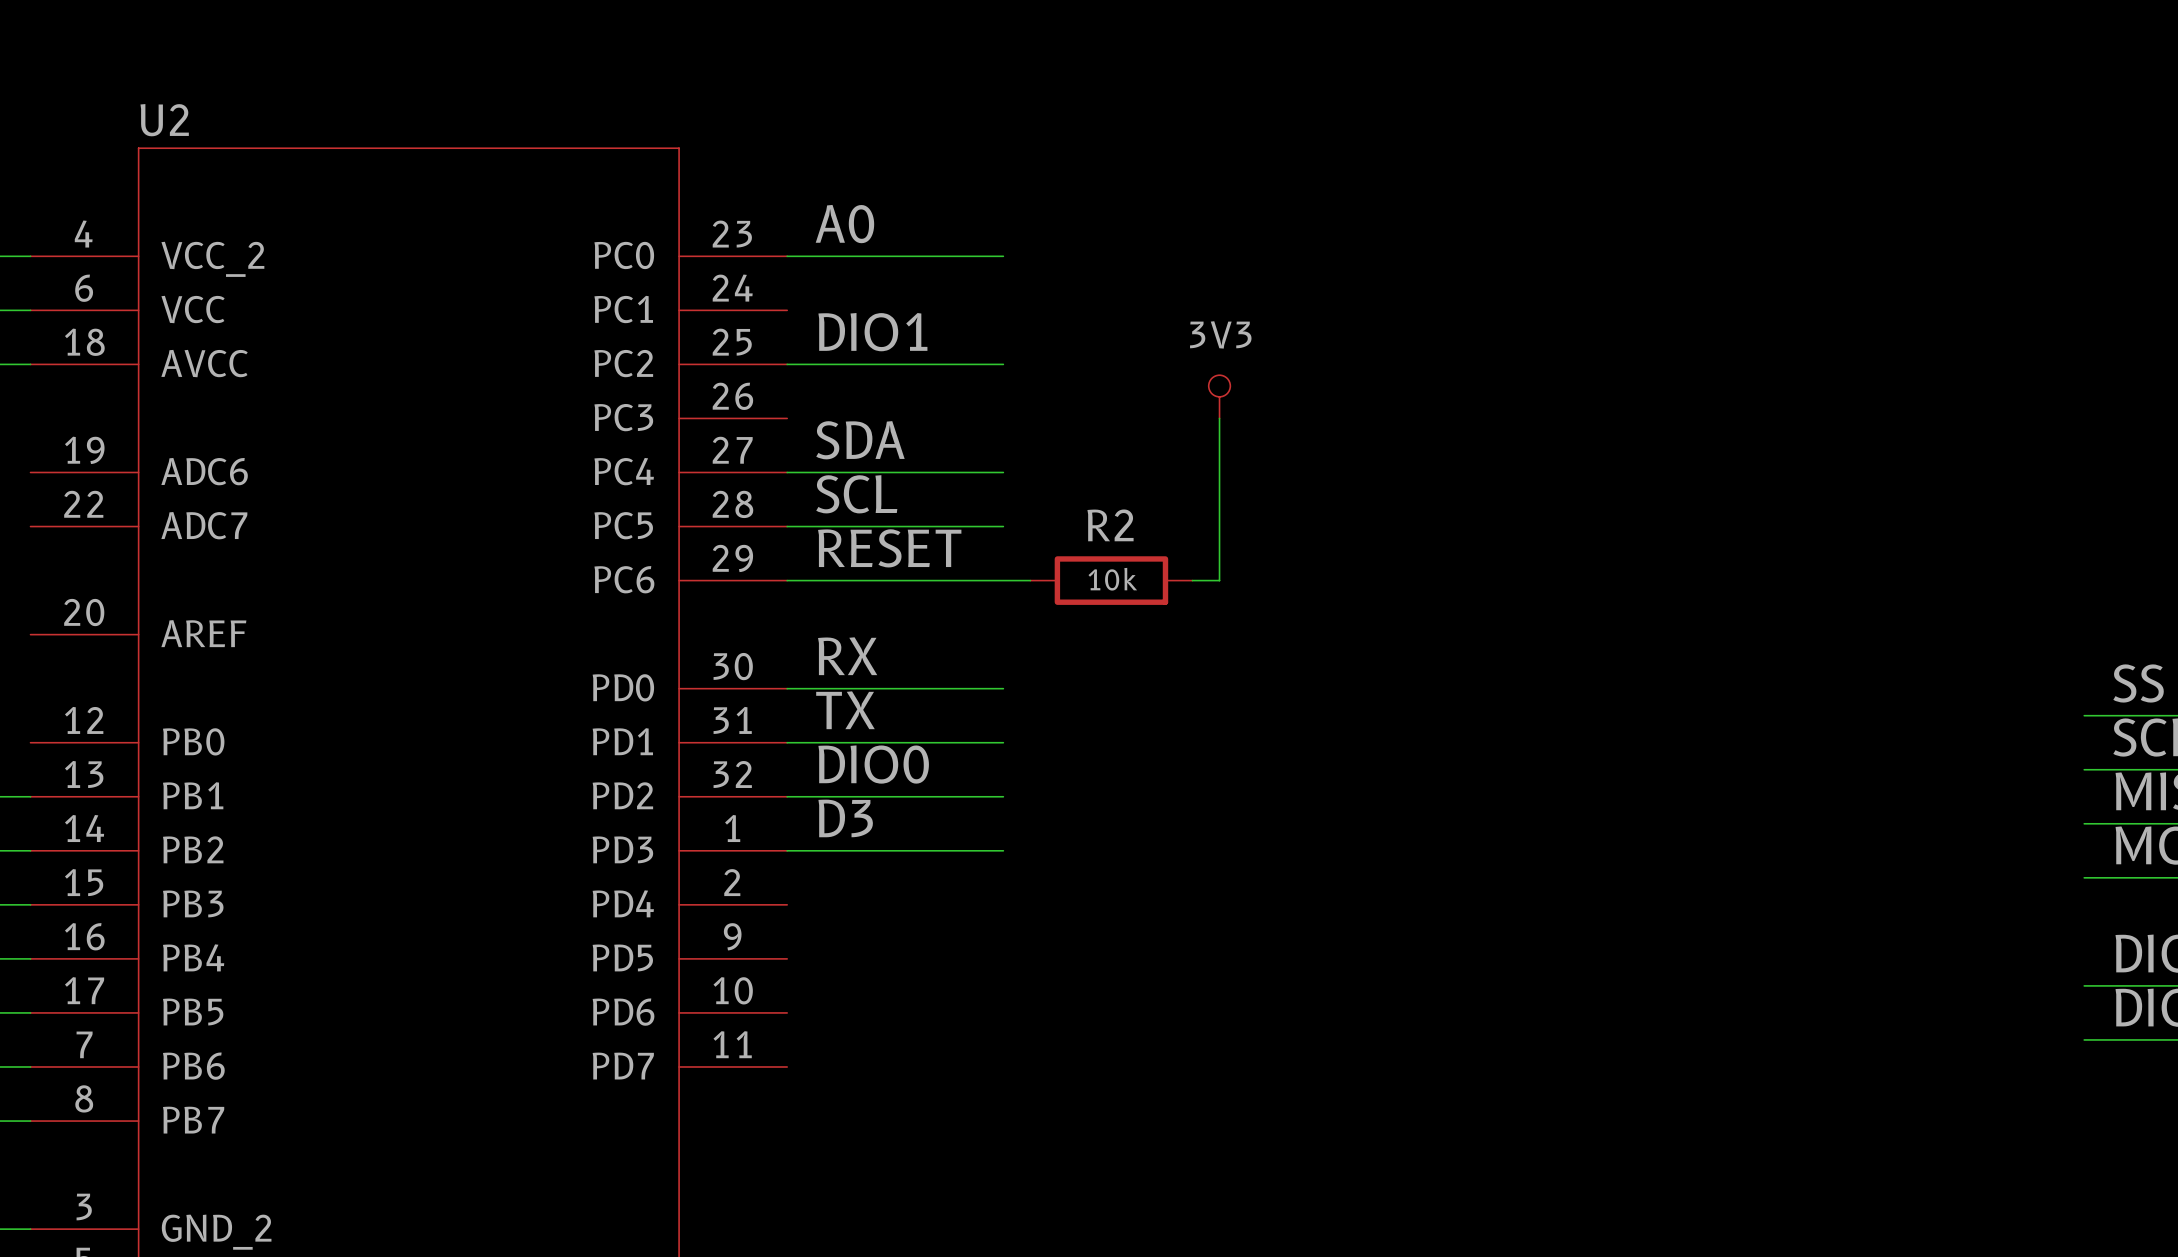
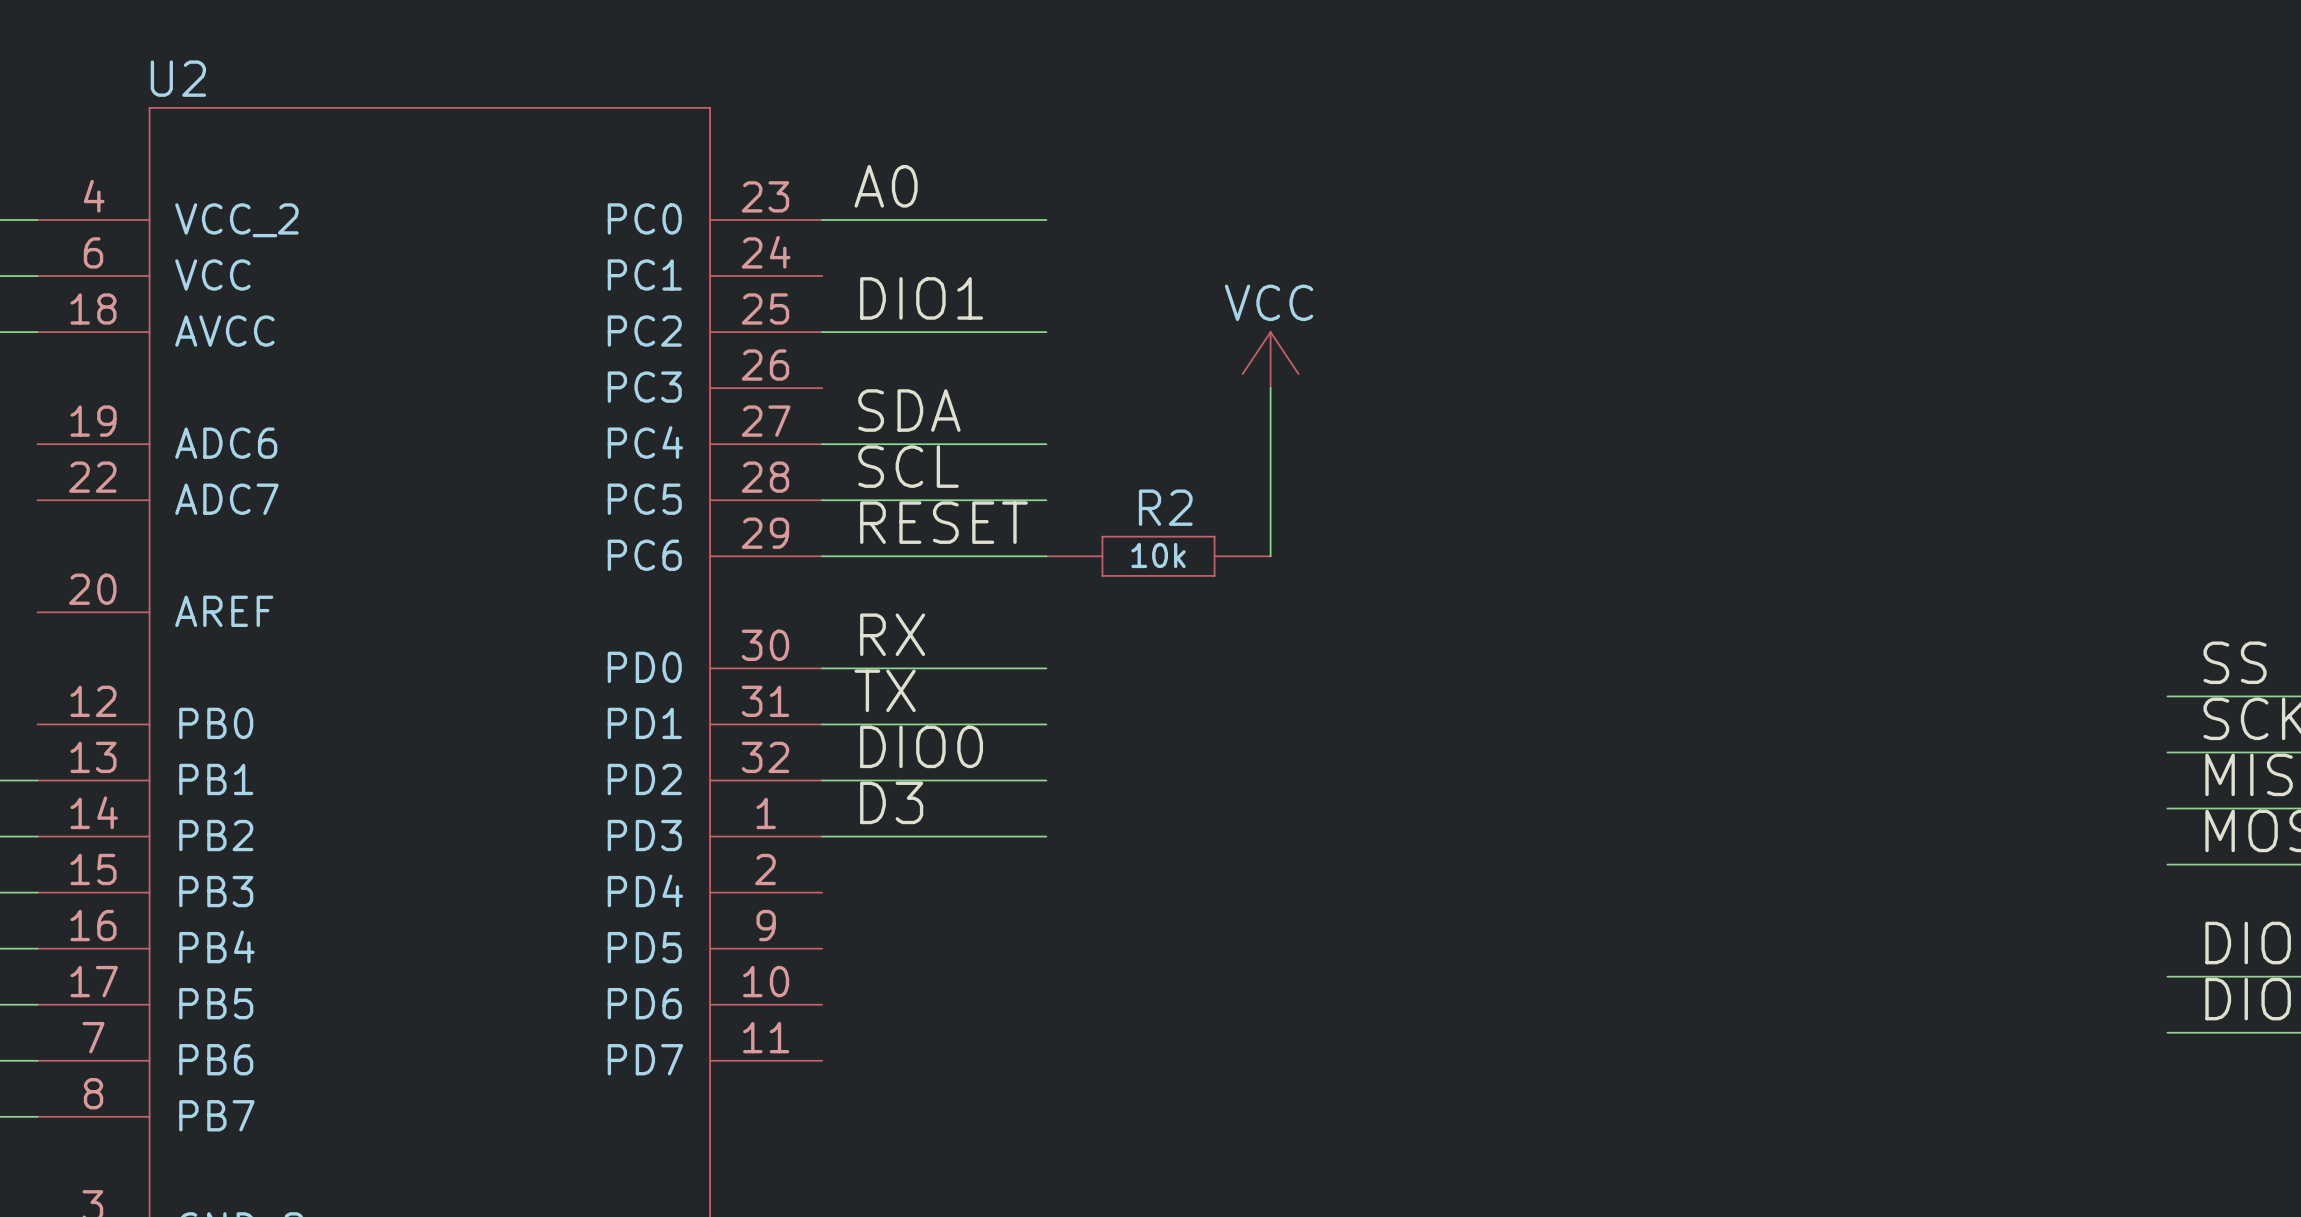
power symbol: 3V3 (1219, 396) -> VCC (1270, 360)
R2 symbol: [1030, 556, 1193, 605] -> [1046, 536, 1271, 576]

